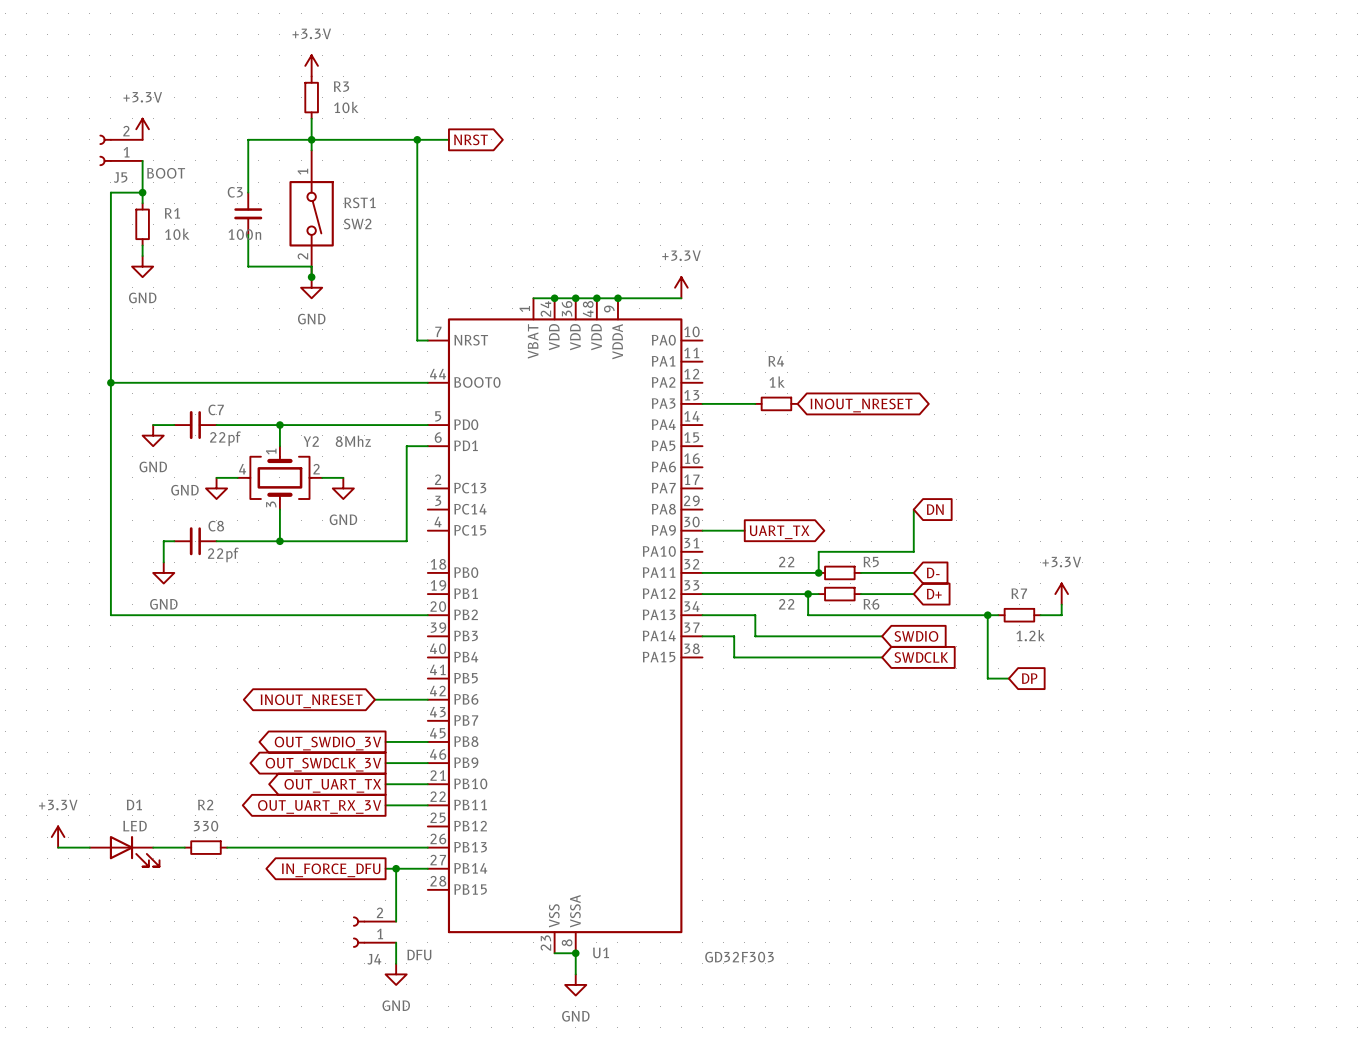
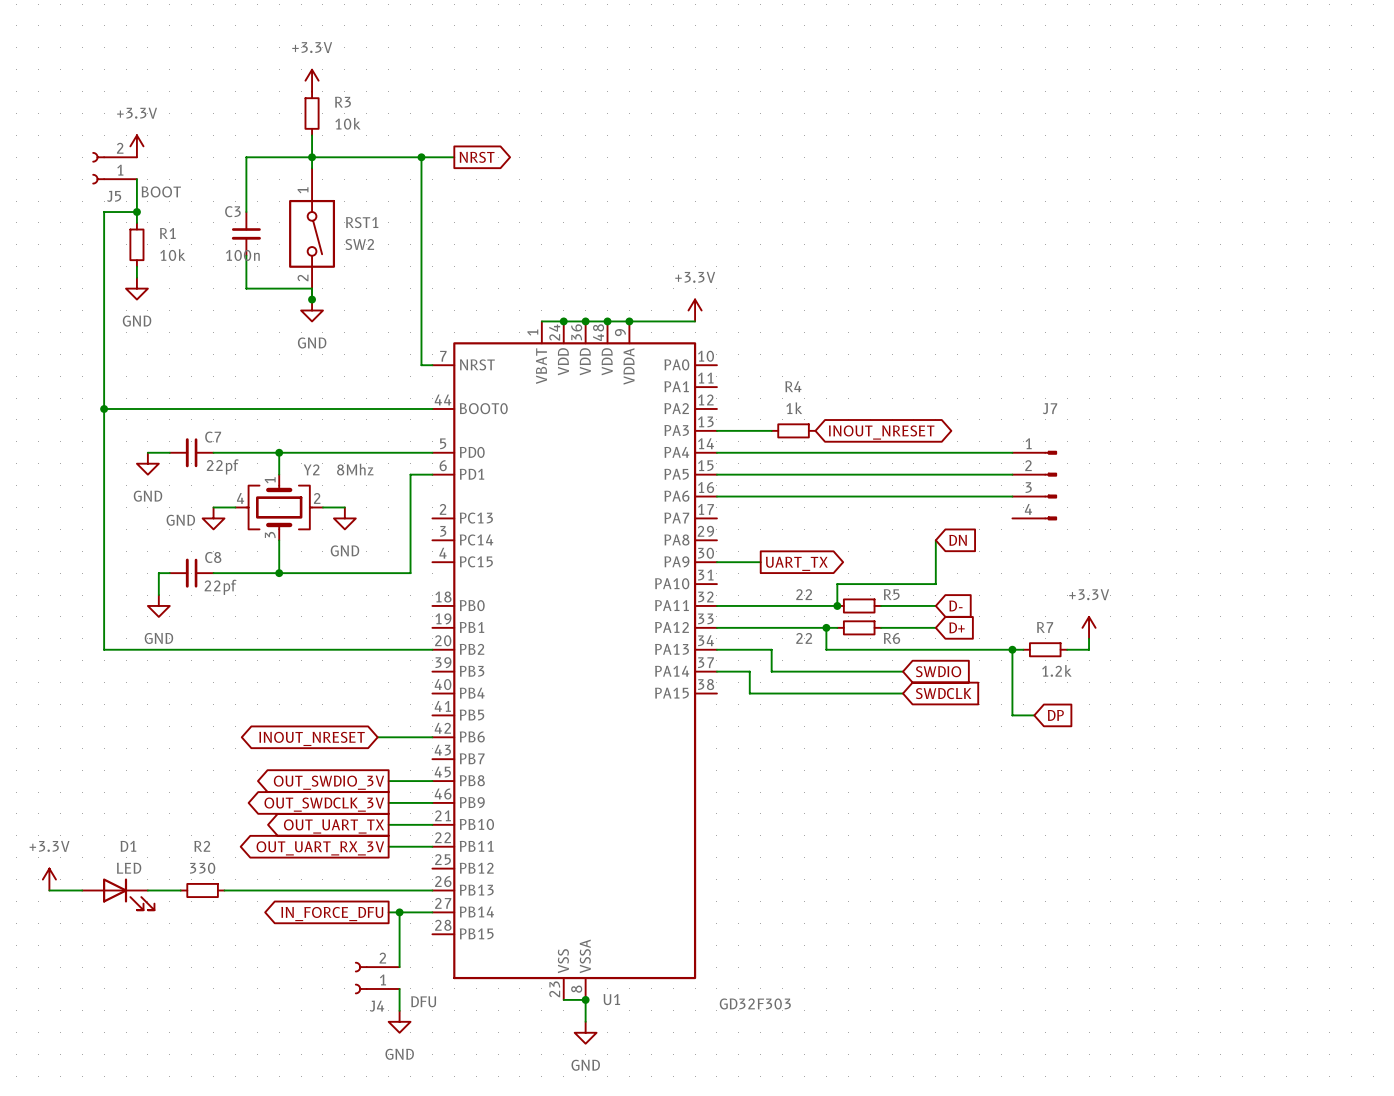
wire: none -> (716, 452) (1012, 452)
wire: none -> (716, 474) (1012, 474)
J7: none -> (1034, 485)
wire: none -> (716, 496) (1012, 496)

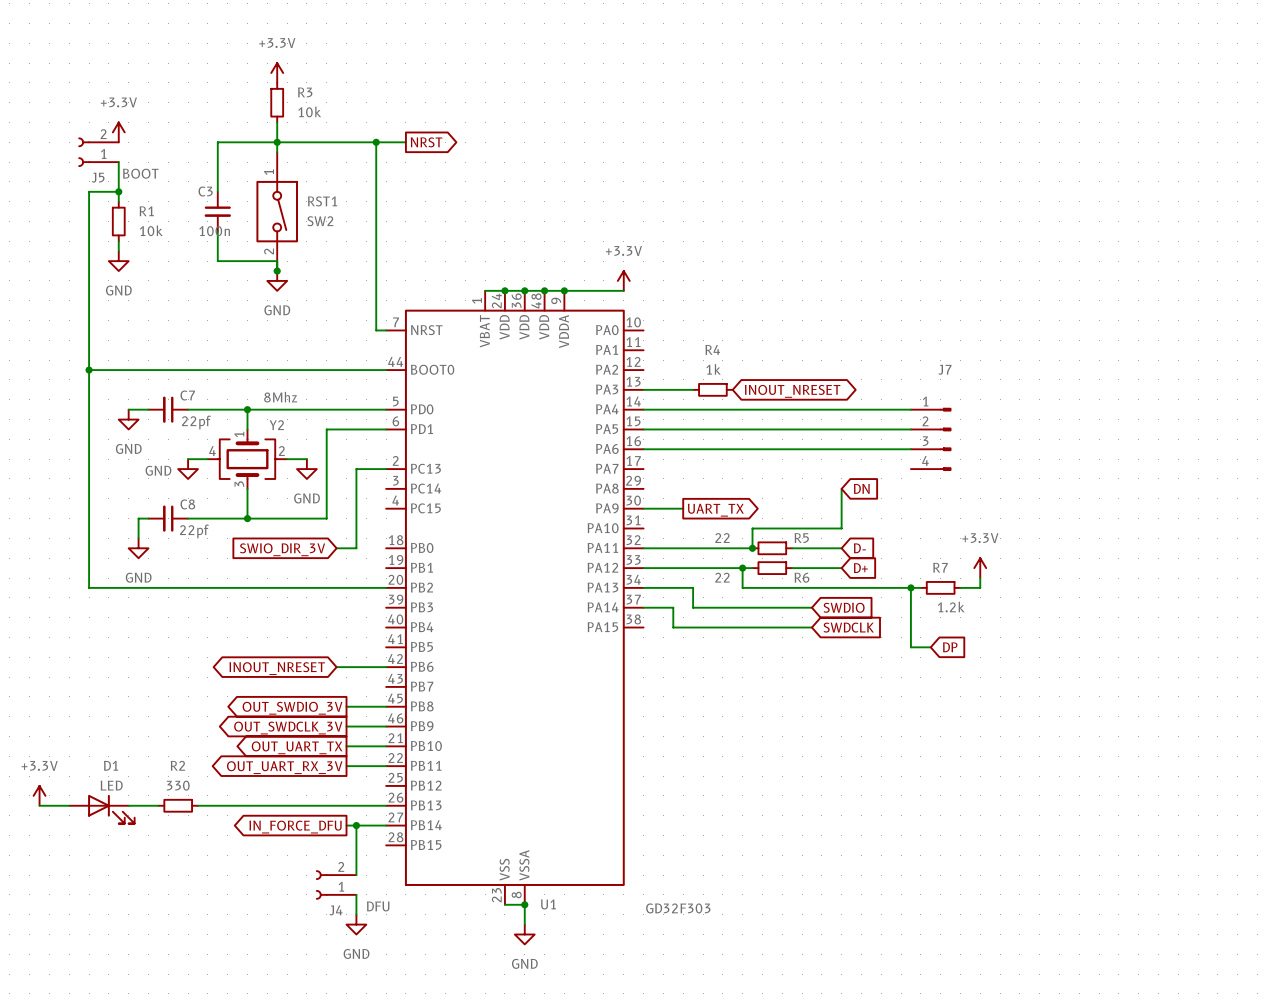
Y2 value position: 8Mhz (355, 469) -> 8Mhz (280, 397)
wire: (410, 474) (410, 573) (366, 573) -> (366, 429) (326, 429) (326, 518)
wire: none -> (386, 469) (356, 469) (356, 548) (336, 548)
global label: none -> SWIO_DIR_3V (282, 549)

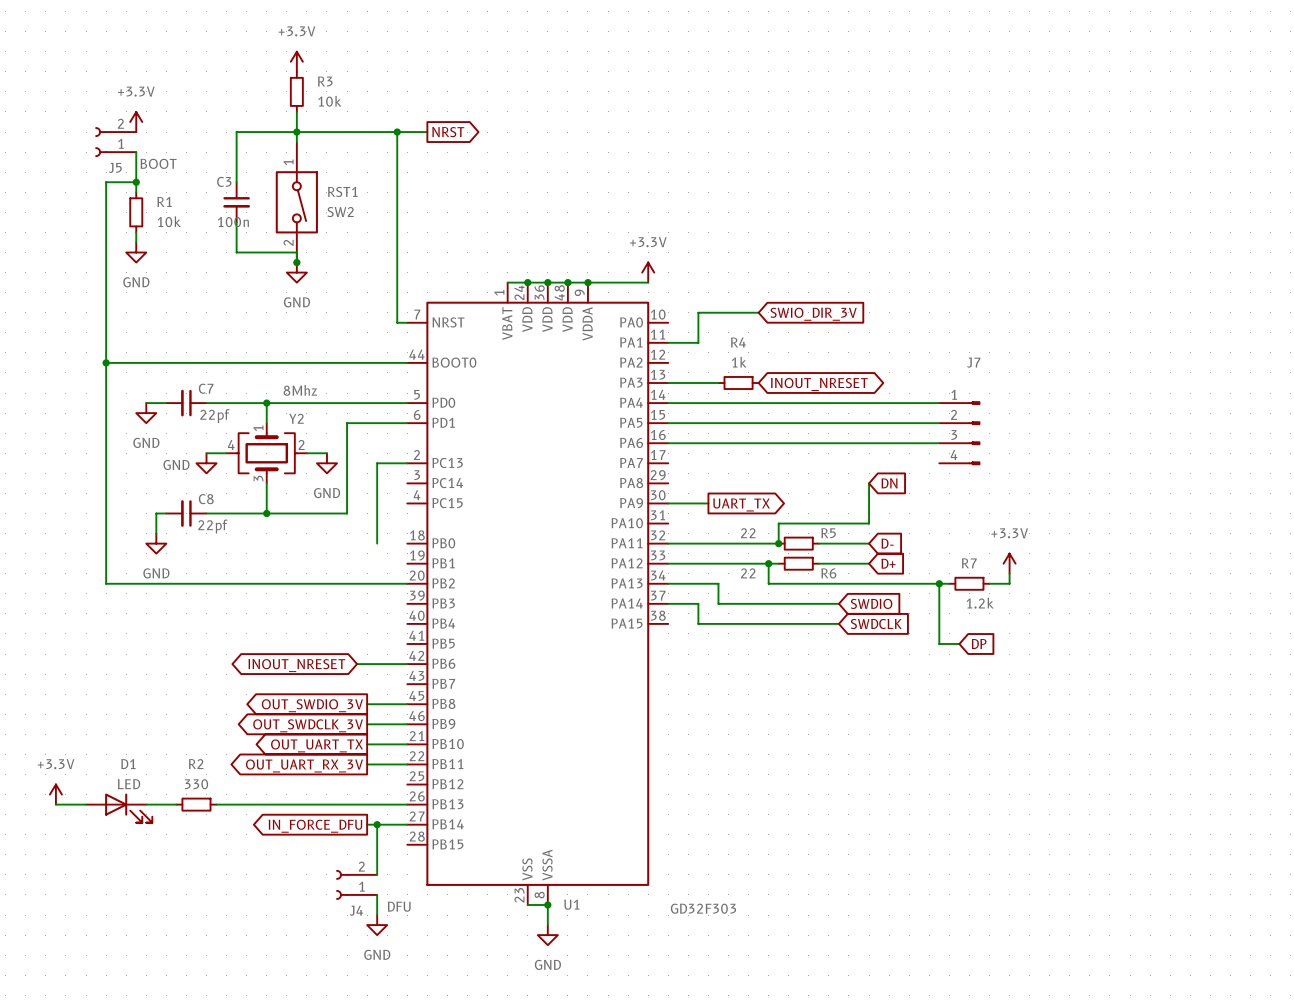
wire: none -> (758, 312) (698, 312) (698, 342) (668, 342)
global label: none -> SWIO_DIR_3V (813, 314)
wire: (336, 548) (356, 548) -> none
global label: SWIO_DIR_3V (282, 549) -> none

